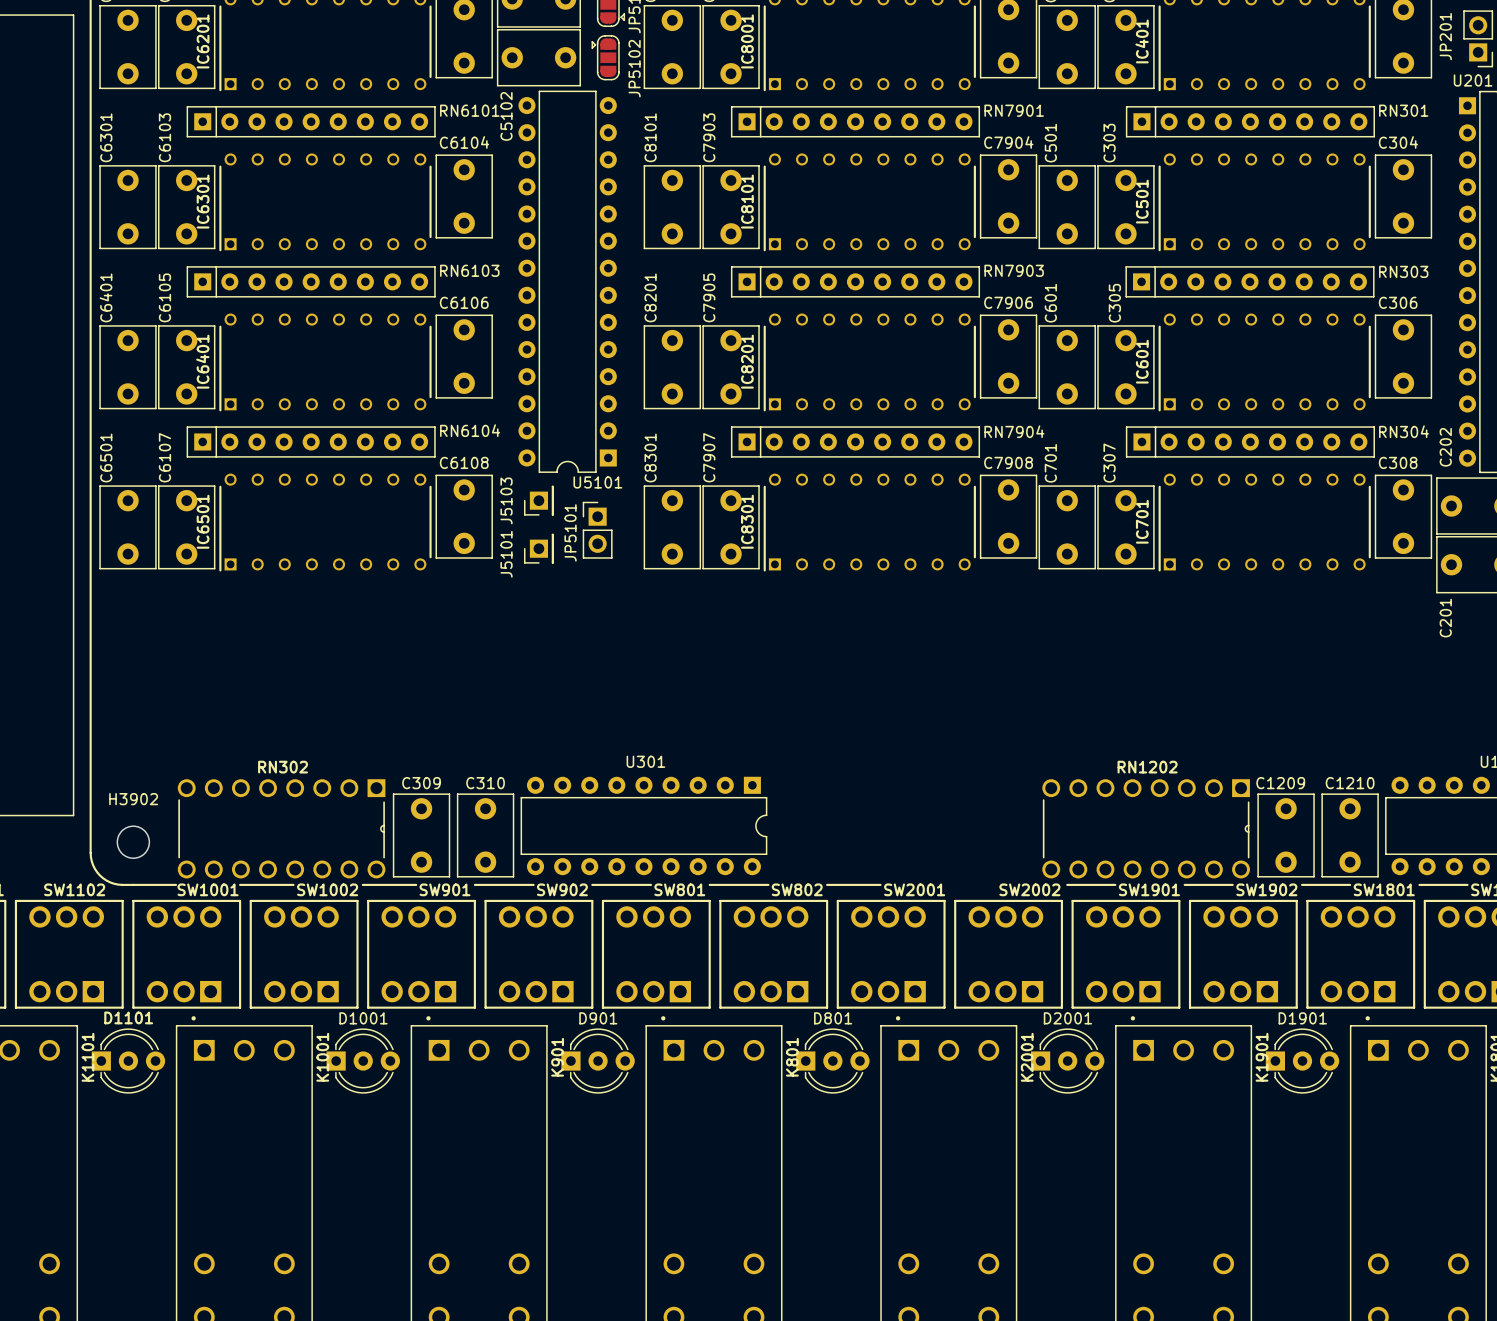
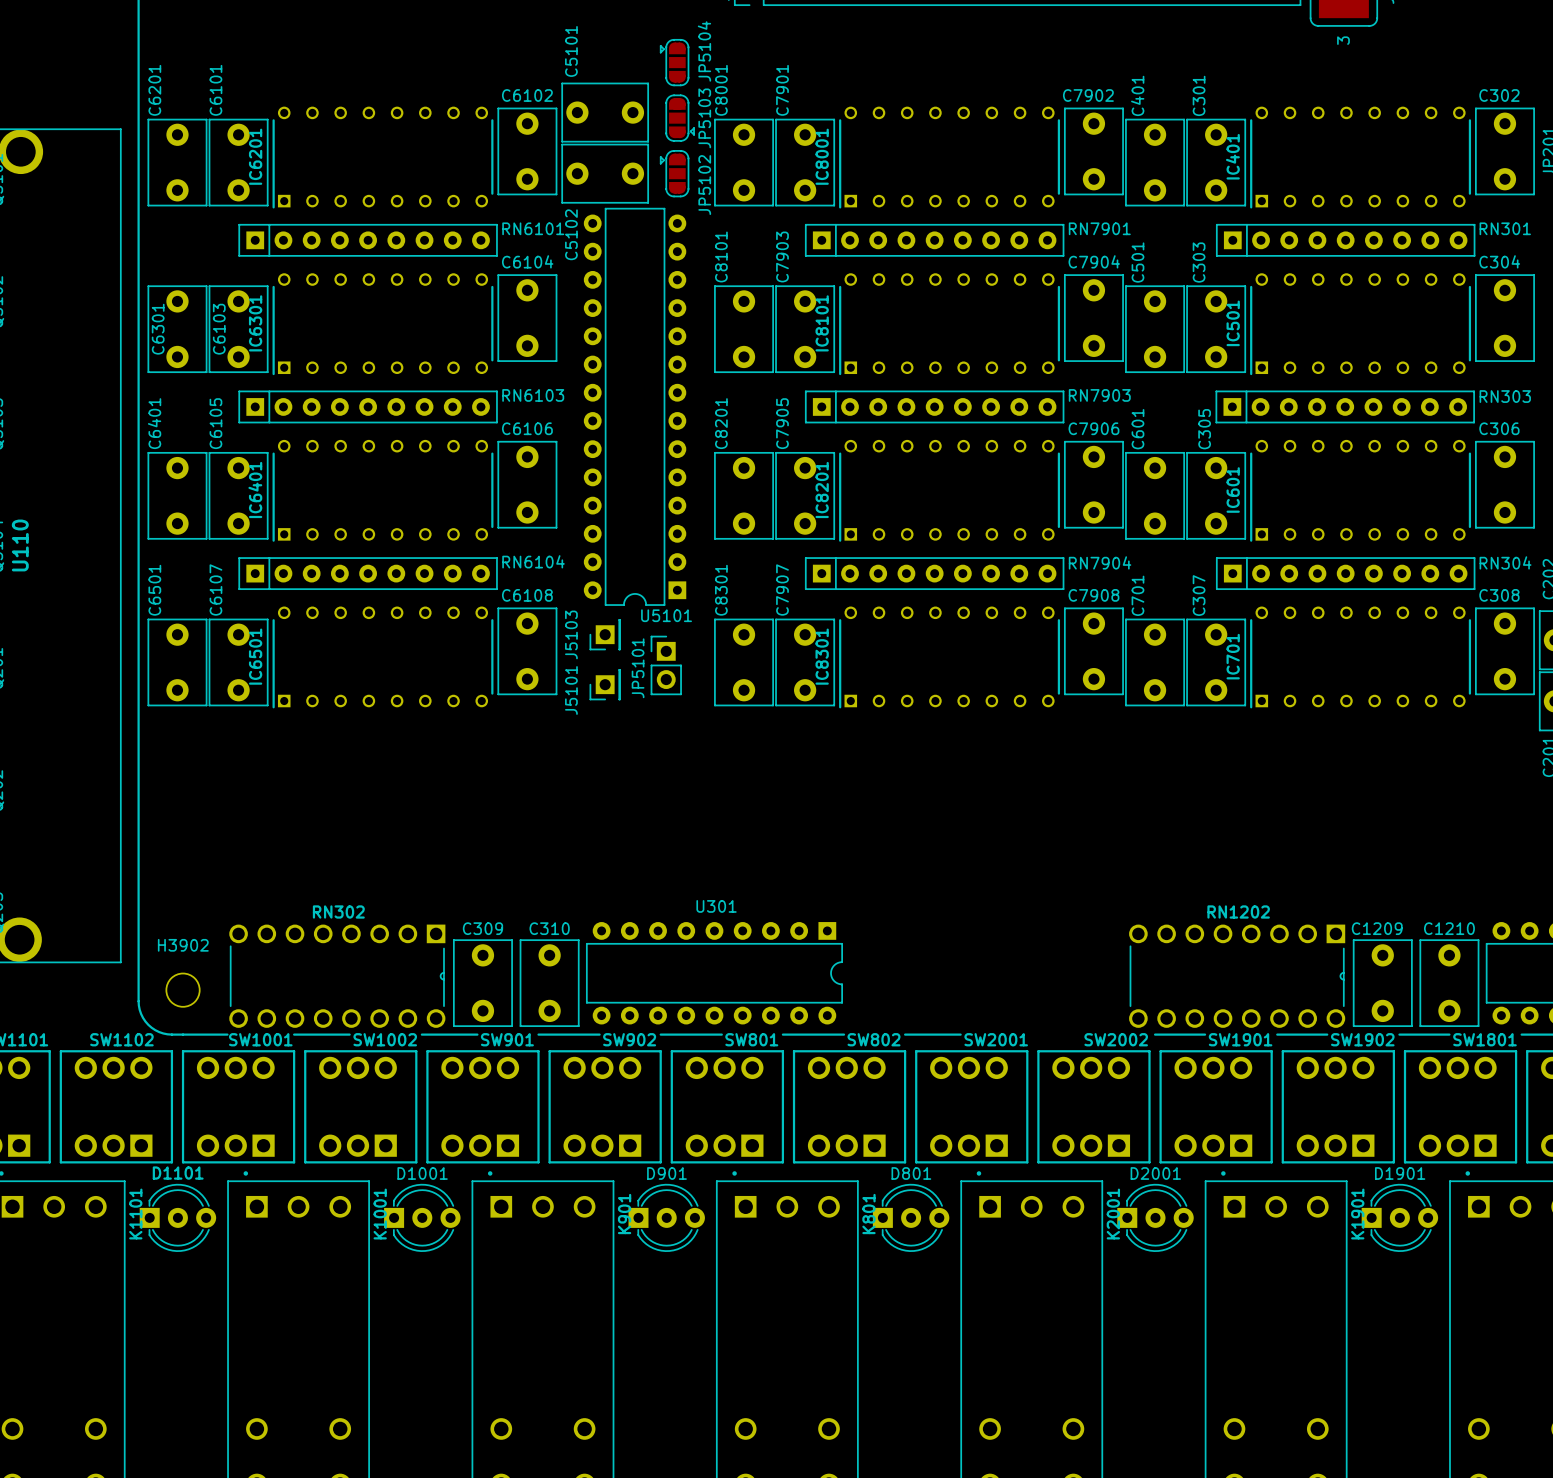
C6301 name position: C6301 (106, 137) -> C6301 (158, 329)
C6103 name position: C6103 (164, 137) -> C6103 (219, 329)

